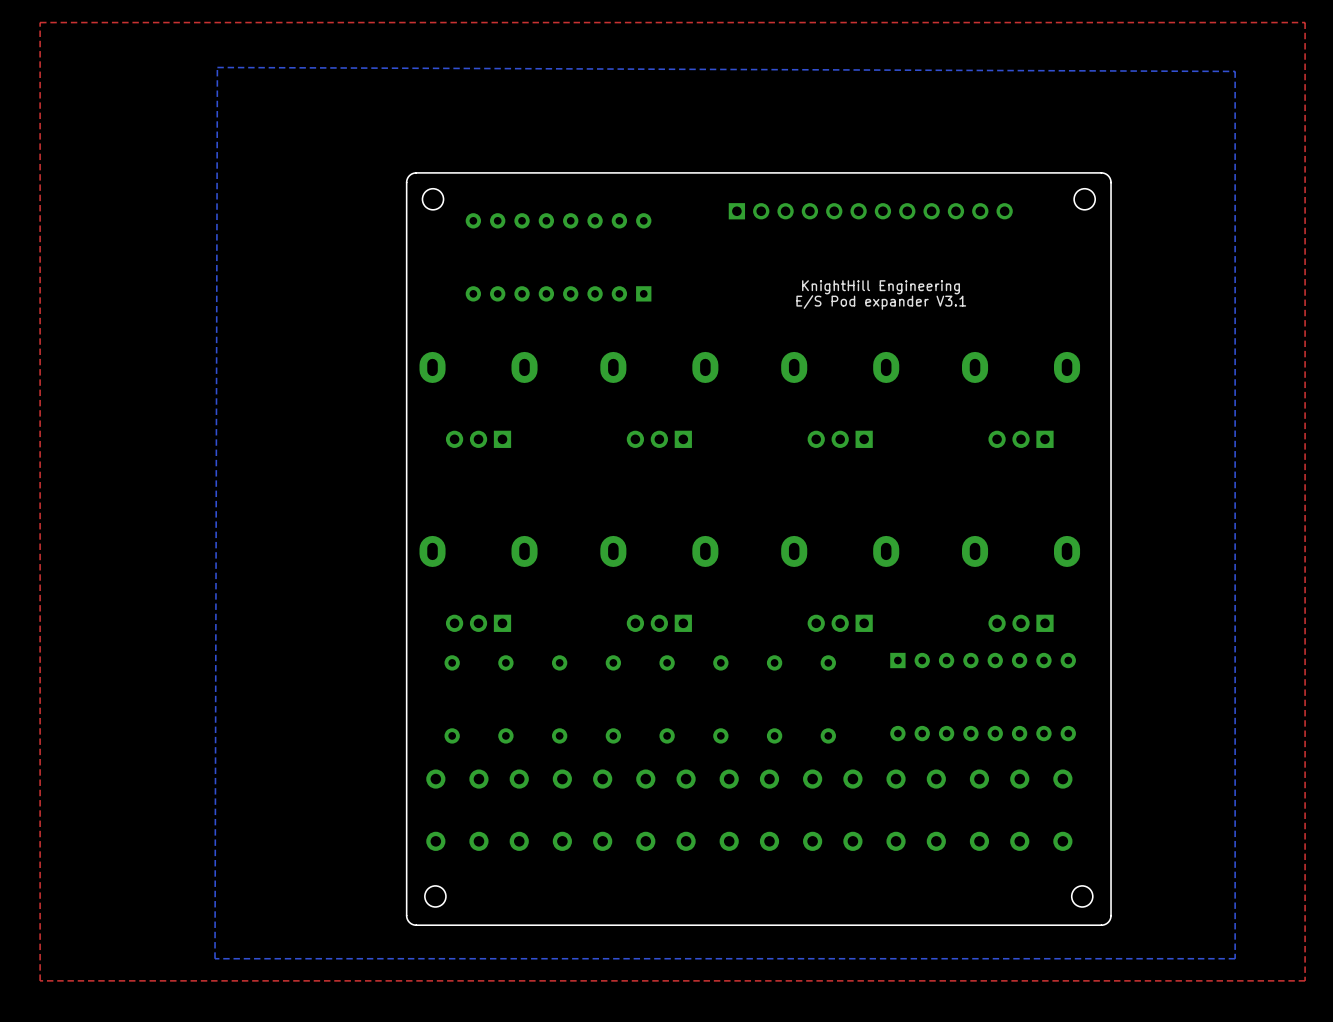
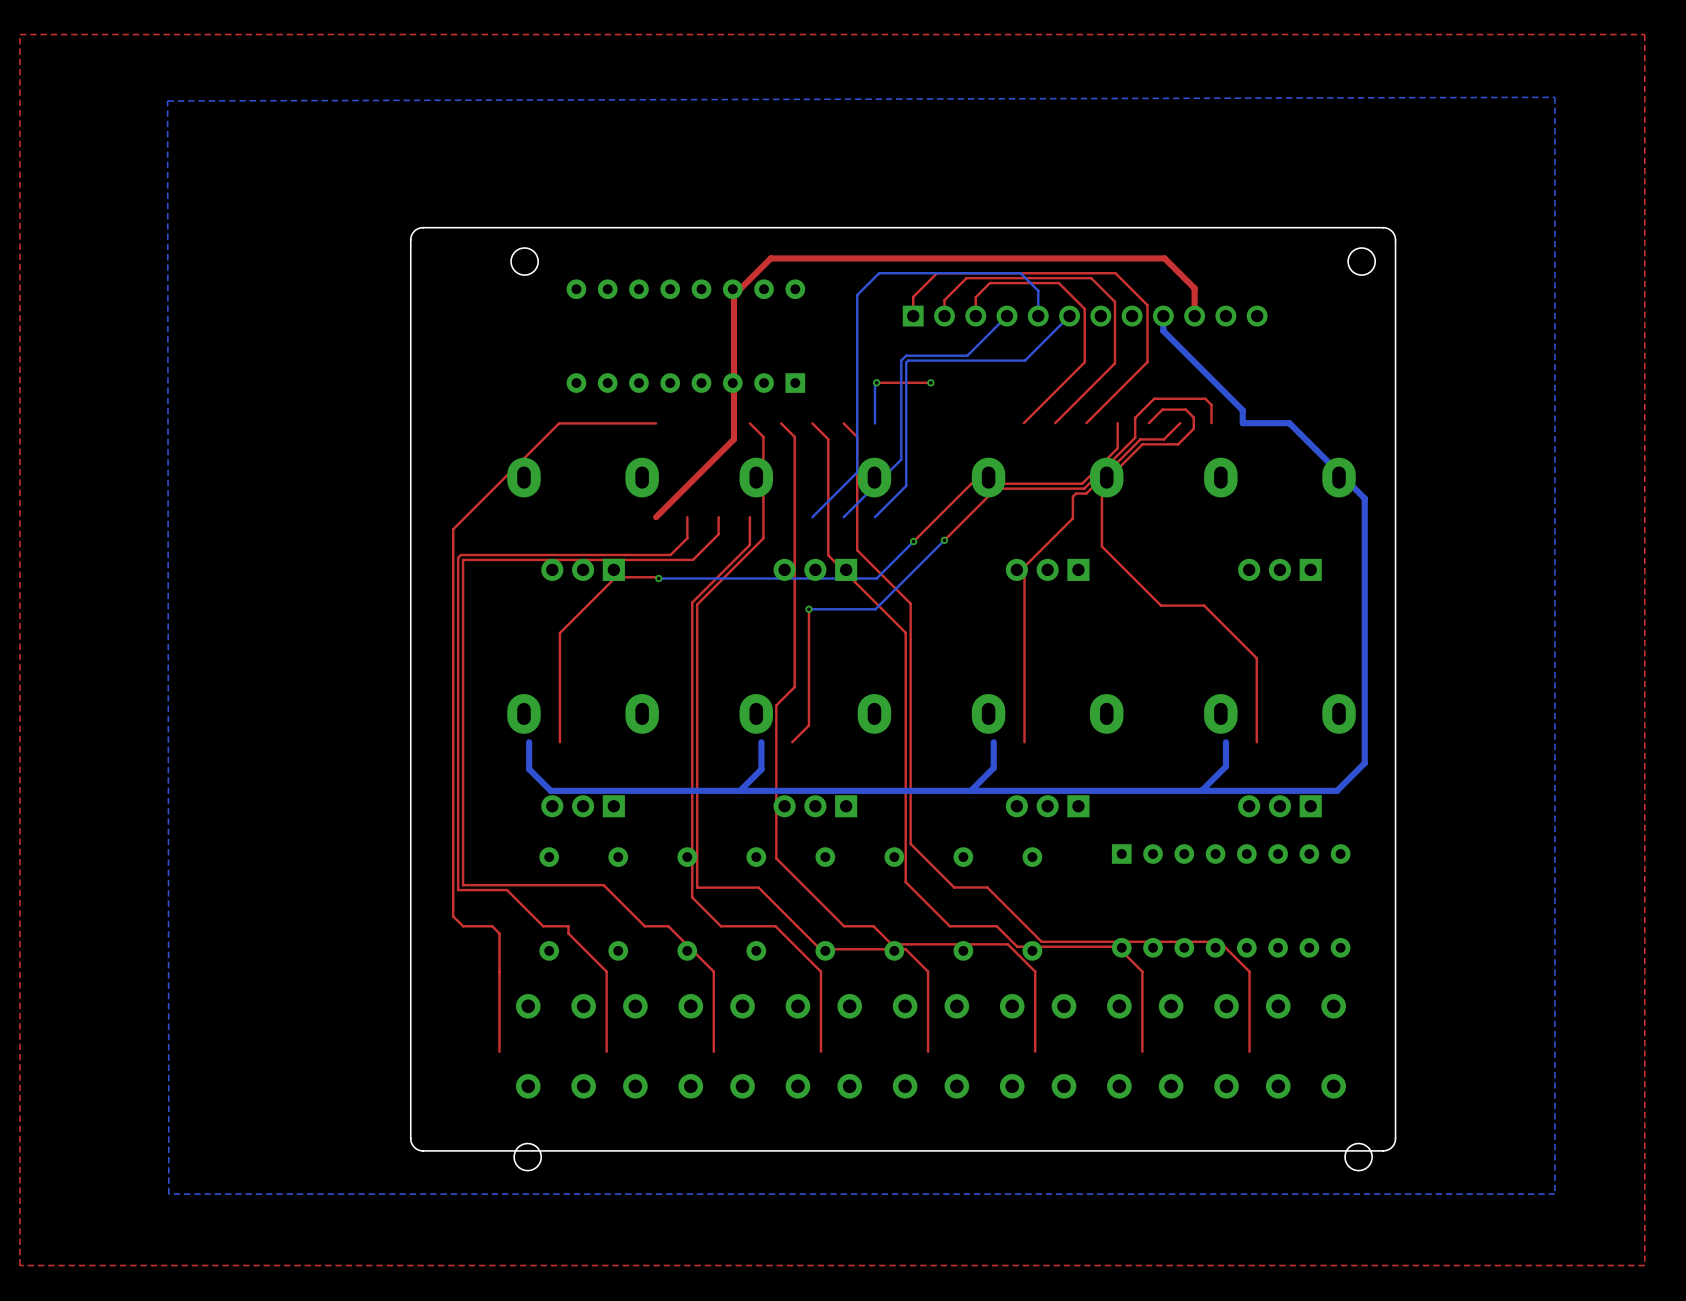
bottom zone outline: (1235, 71) (217, 67) (214, 958) (1235, 958) (1235, 925) -> (1554, 97) (167, 101) (168, 1194) (1554, 1194)
board edge: (416, 172) (409, 175) (406, 182) (406, 915) (409, 922) (416, 925) (1102, 925) (1108, 922) (1110, 917) (1111, 882) -> (503, 227) (421, 227) (414, 231) (410, 238) (410, 1138) (414, 1147) (423, 1150) (1383, 1150) (1391, 1147) (1395, 1138)
part position: (870, 211) -> (1085, 316)
top track: none -> (913, 316) (913, 296) (936, 273) (1115, 273) (1147, 305) (1147, 362) (1086, 423)
top track: none -> (944, 316) (944, 300) (966, 278) (1091, 278) (1114, 301) (1114, 363) (1055, 423)
top track: none -> (975, 316) (975, 297) (989, 283) (1058, 283) (1084, 308) (1084, 362) (1023, 423)
bottom track: none -> (1007, 316) (967, 355) (906, 355) (901, 360) (901, 459) (843, 517)
bottom track: none -> (1038, 316) (1038, 290) (1020, 273) (879, 273) (857, 295) (857, 472) (812, 517)
bottom track: none -> (1069, 316) (1025, 360) (908, 360) (906, 362) (906, 485) (874, 517)
bottom track: none -> (1163, 316) (1163, 330) (1242, 410) (1242, 423) (1289, 423) (1364, 498) (1364, 763) (1337, 790) (550, 790) (529, 769) (529, 742)
top track: none -> (1194, 316) (1194, 288) (1164, 258) (770, 258) (734, 295) (734, 439) (656, 517)
text: KnightHill Engineering (881, 287) -> none
bottom track: none -> (876, 382) (874, 384) (874, 423)
via: none -> (876, 382)
top track: none -> (930, 382) (876, 382)
via: none -> (930, 382)
text: E/S Pod expander V3.1 (881, 302) -> none
top track: none -> (656, 423) (559, 423) (453, 529) (453, 916) (463, 926) (492, 926) (499, 933) (499, 1051)
top track: none -> (749, 423) (763, 436) (763, 538) (697, 604) (697, 887) (758, 887) (820, 949) (905, 949) (928, 971) (928, 1051)
top track: none -> (781, 423) (794, 436) (794, 687) (776, 705) (776, 858) (844, 926) (873, 926) (891, 944) (1007, 944) (1035, 971) (1035, 1051)
top track: none -> (812, 423) (828, 439) (828, 555) (905, 632) (905, 882) (949, 926) (996, 926) (1017, 946) (1117, 946) (1142, 971) (1142, 1051)
top track: none -> (843, 423) (857, 436) (857, 550) (910, 603) (910, 843) (954, 887) (987, 887) (1041, 941) (1219, 941) (1249, 971) (1249, 1051)
top track: none -> (1117, 423) (1117, 448) (1082, 483) (971, 483) (913, 541)
top track: none -> (1148, 423) (1162, 409) (1185, 409) (1193, 417) (1193, 428) (1178, 444) (1142, 444) (1101, 484) (1101, 546) (1161, 605) (1204, 605) (1256, 658) (1256, 742)
top track: none -> (1180, 423) (1163, 439) (1140, 439) (1086, 493) (1076, 493) (1072, 496) (1072, 518) (1024, 566) (1024, 742)
top track: none -> (1211, 423) (1211, 404) (1205, 398) (1154, 398) (1135, 417) (1135, 437) (1084, 488) (996, 488) (944, 540)
top track: none -> (687, 517) (687, 538) (670, 555) (461, 555) (458, 557) (458, 890) (507, 890) (543, 926) (568, 926) (568, 933) (606, 971) (606, 1051)
top track: none -> (718, 517) (718, 534) (693, 559) (463, 559) (463, 885) (603, 885) (644, 926) (668, 926) (713, 971) (713, 1051)
top track: none -> (749, 517) (749, 544) (692, 602) (692, 897) (721, 926) (775, 926) (820, 971) (820, 1051)
bottom track: none -> (944, 540) (875, 609) (808, 609)
via: none -> (944, 540)
bottom track: none -> (913, 541) (876, 578) (658, 578)
via: none -> (913, 541)
top track: none -> (658, 578) (615, 577) (559, 633) (559, 742)
via: none -> (658, 578)
top track: none -> (808, 609) (808, 725) (792, 742)
via: none -> (808, 609)
bottom track: none -> (761, 742) (761, 769) (740, 790)
bottom track: none -> (993, 742) (993, 767) (970, 790)
bottom track: none -> (1226, 742) (1226, 766) (1201, 790)

